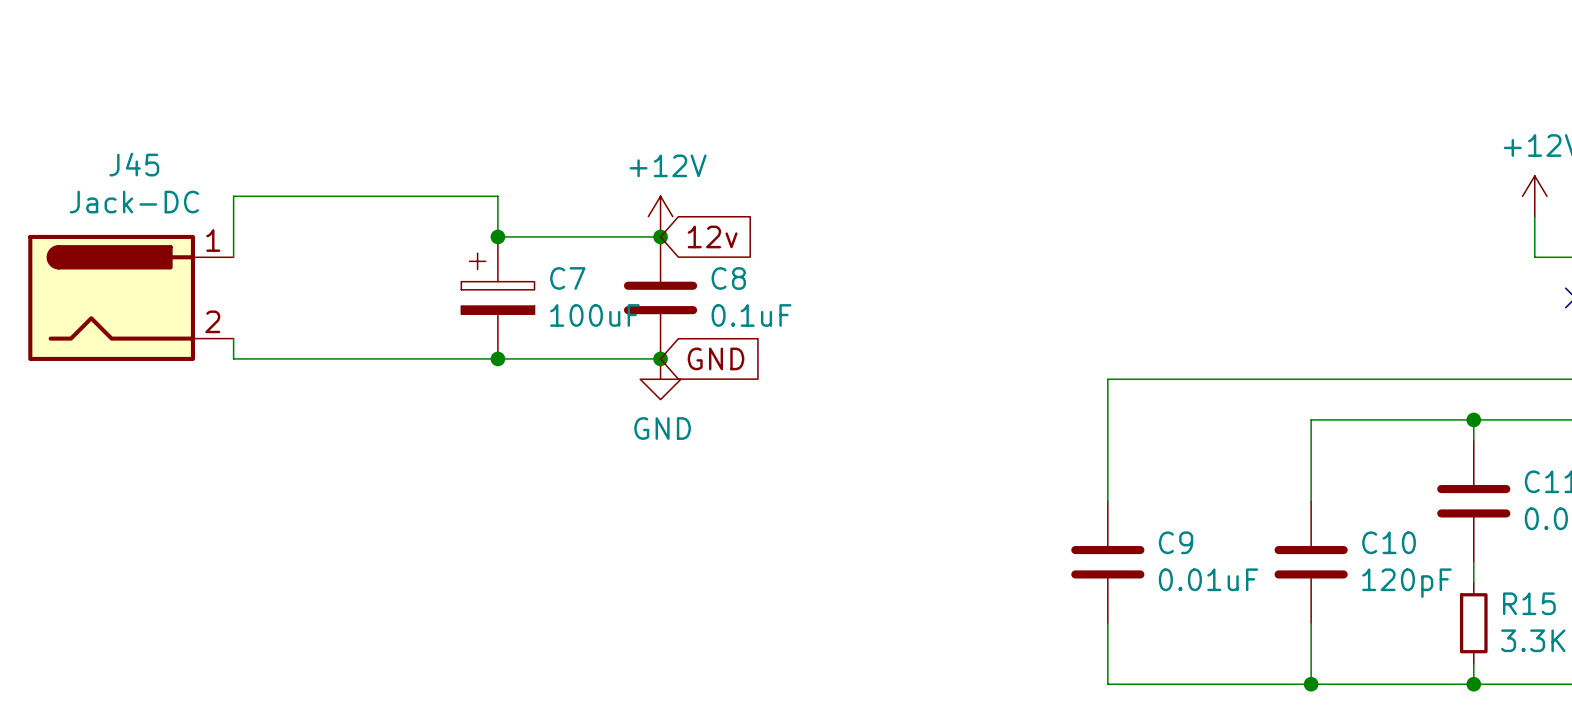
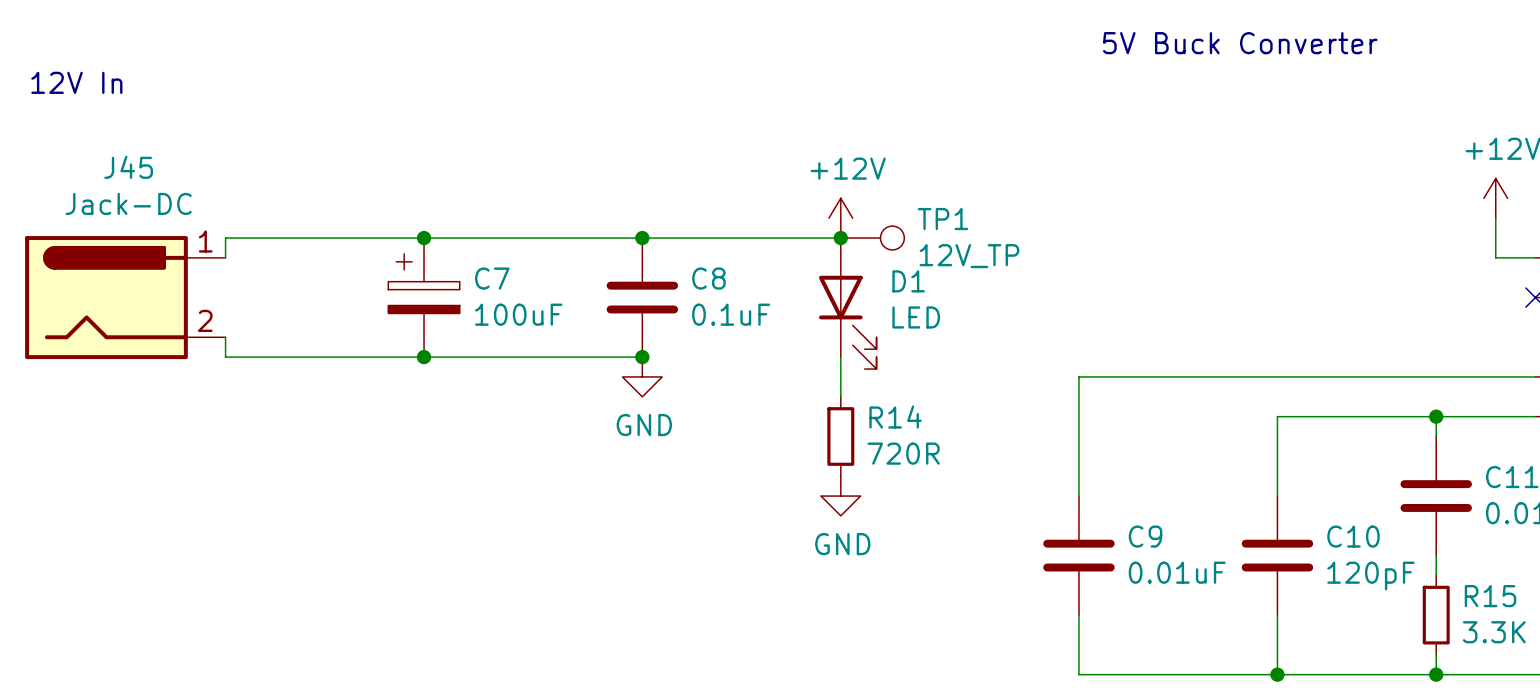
text: none -> 5V Buck Converter (1240, 43)
text: none -> 12V In (76, 82)
power symbol position: +12V (660, 216) -> +12V (840, 218)
wire: (233, 236) (233, 196) (497, 196) (497, 236) -> (225, 238) (483, 238)
junction position: (497, 236) -> (424, 238)
wire: none -> (642, 238) (840, 238)
global label: 12v (712, 236) -> none
junction: none -> (840, 238)
TP1: none -> 12V_TP (872, 238)
C7 position: (497, 297) -> (424, 297)
D1: none -> LED (847, 303)
junction position: (497, 358) -> (424, 357)
global label: GND (716, 358) -> none
wire: none -> (840, 357) (840, 396)
R14: none -> 720R (840, 436)
power symbol: none -> GND (840, 496)

